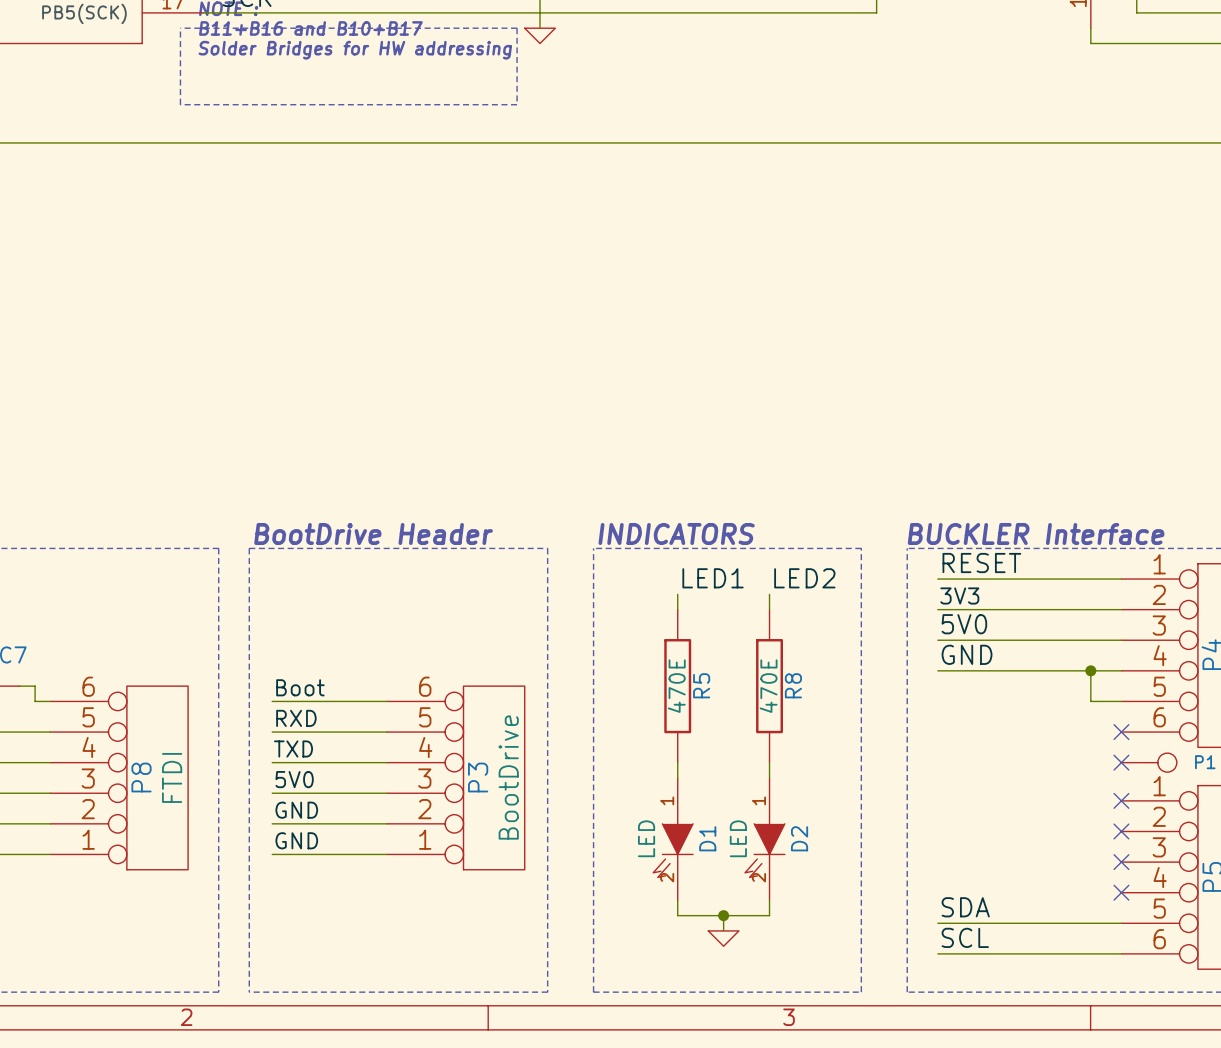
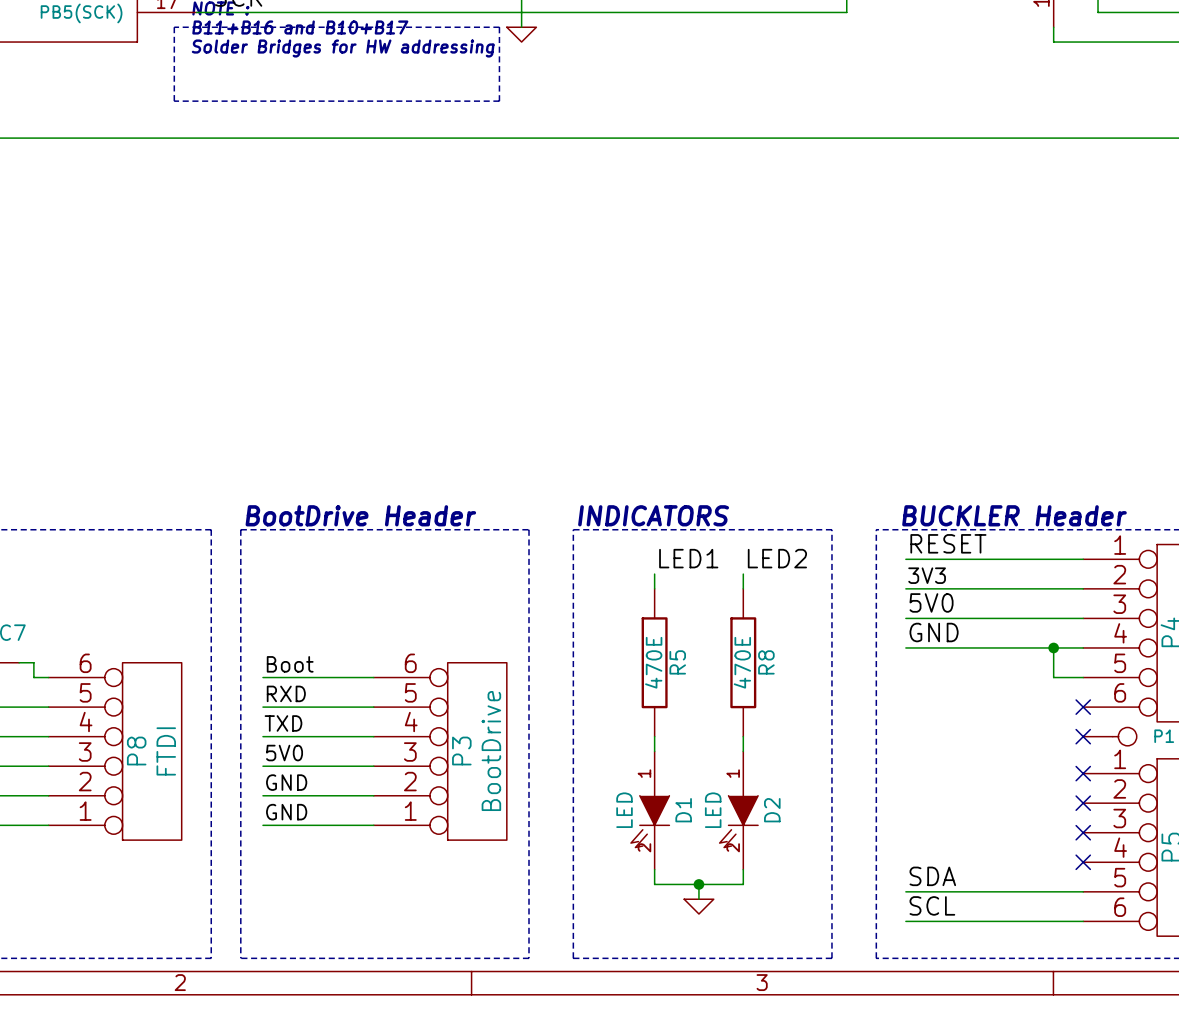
text: BUCKLER Interface (1036, 533) -> BUCKLER Header (1014, 515)

